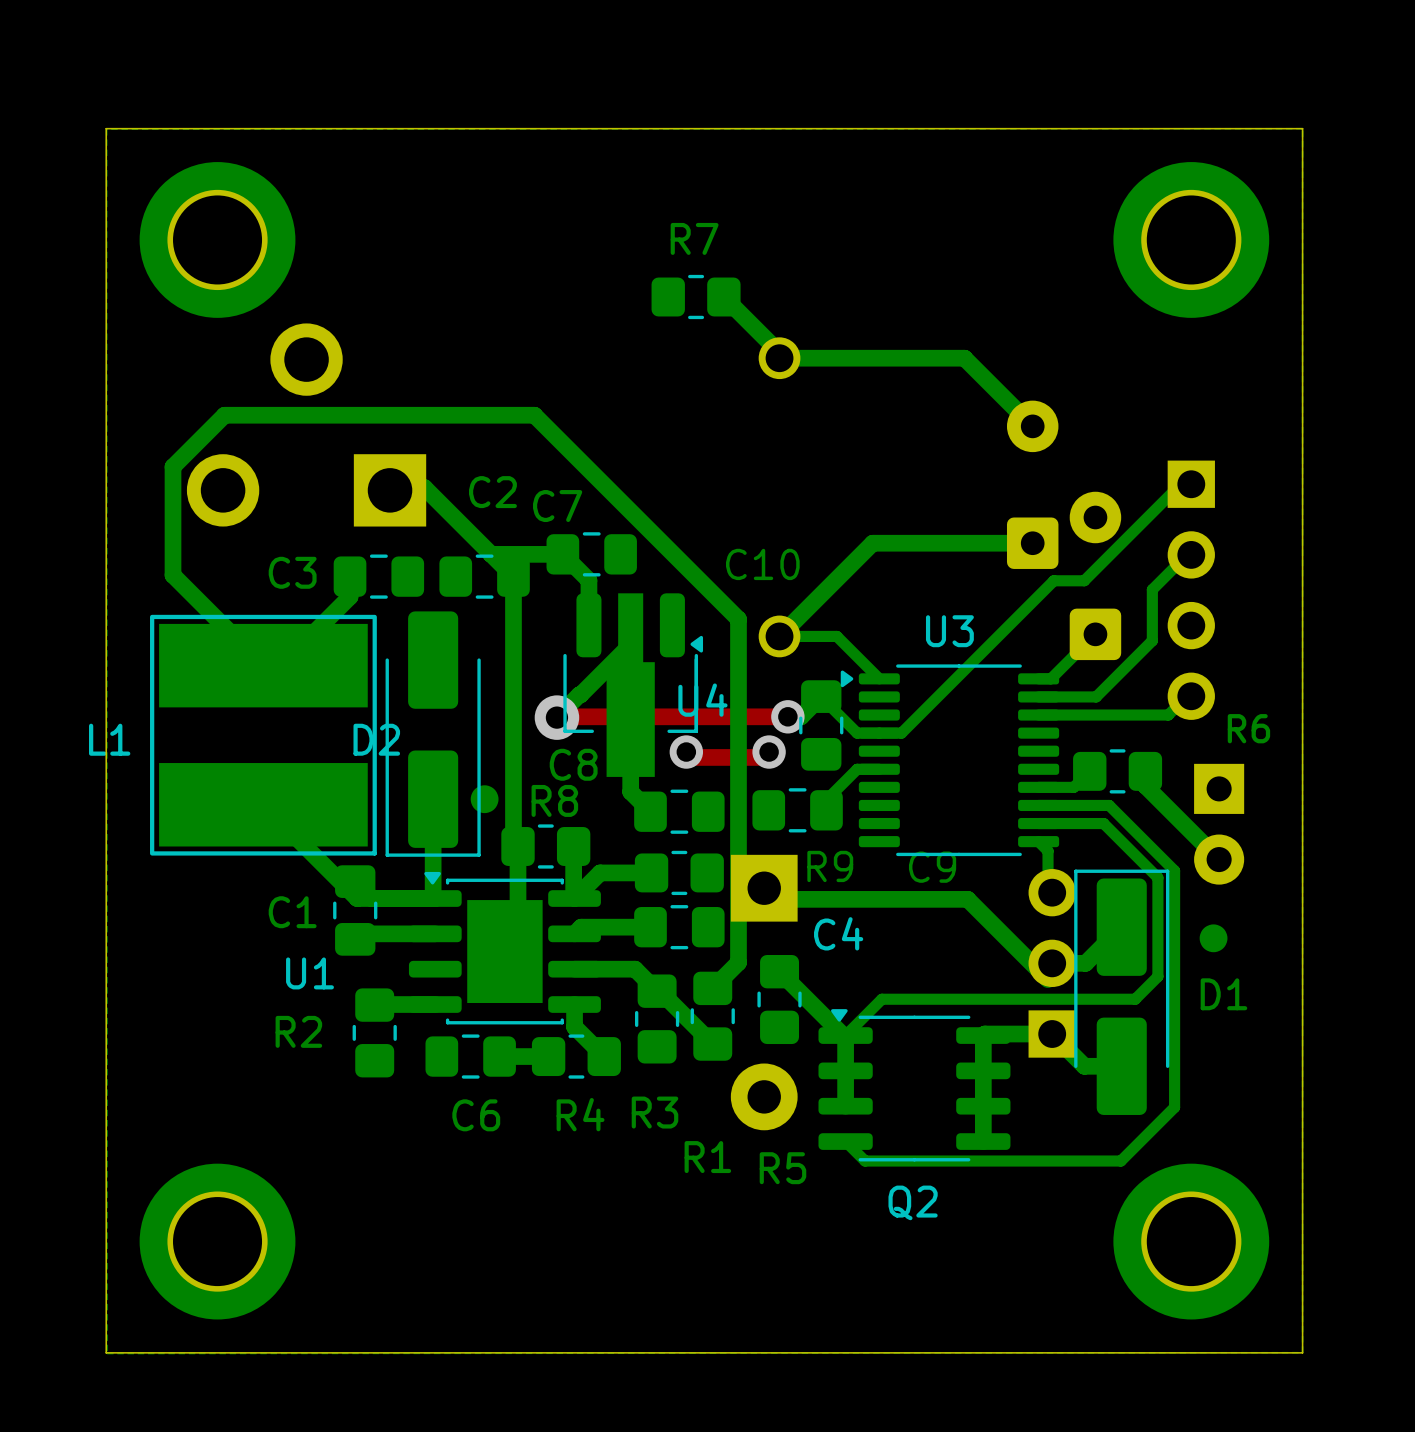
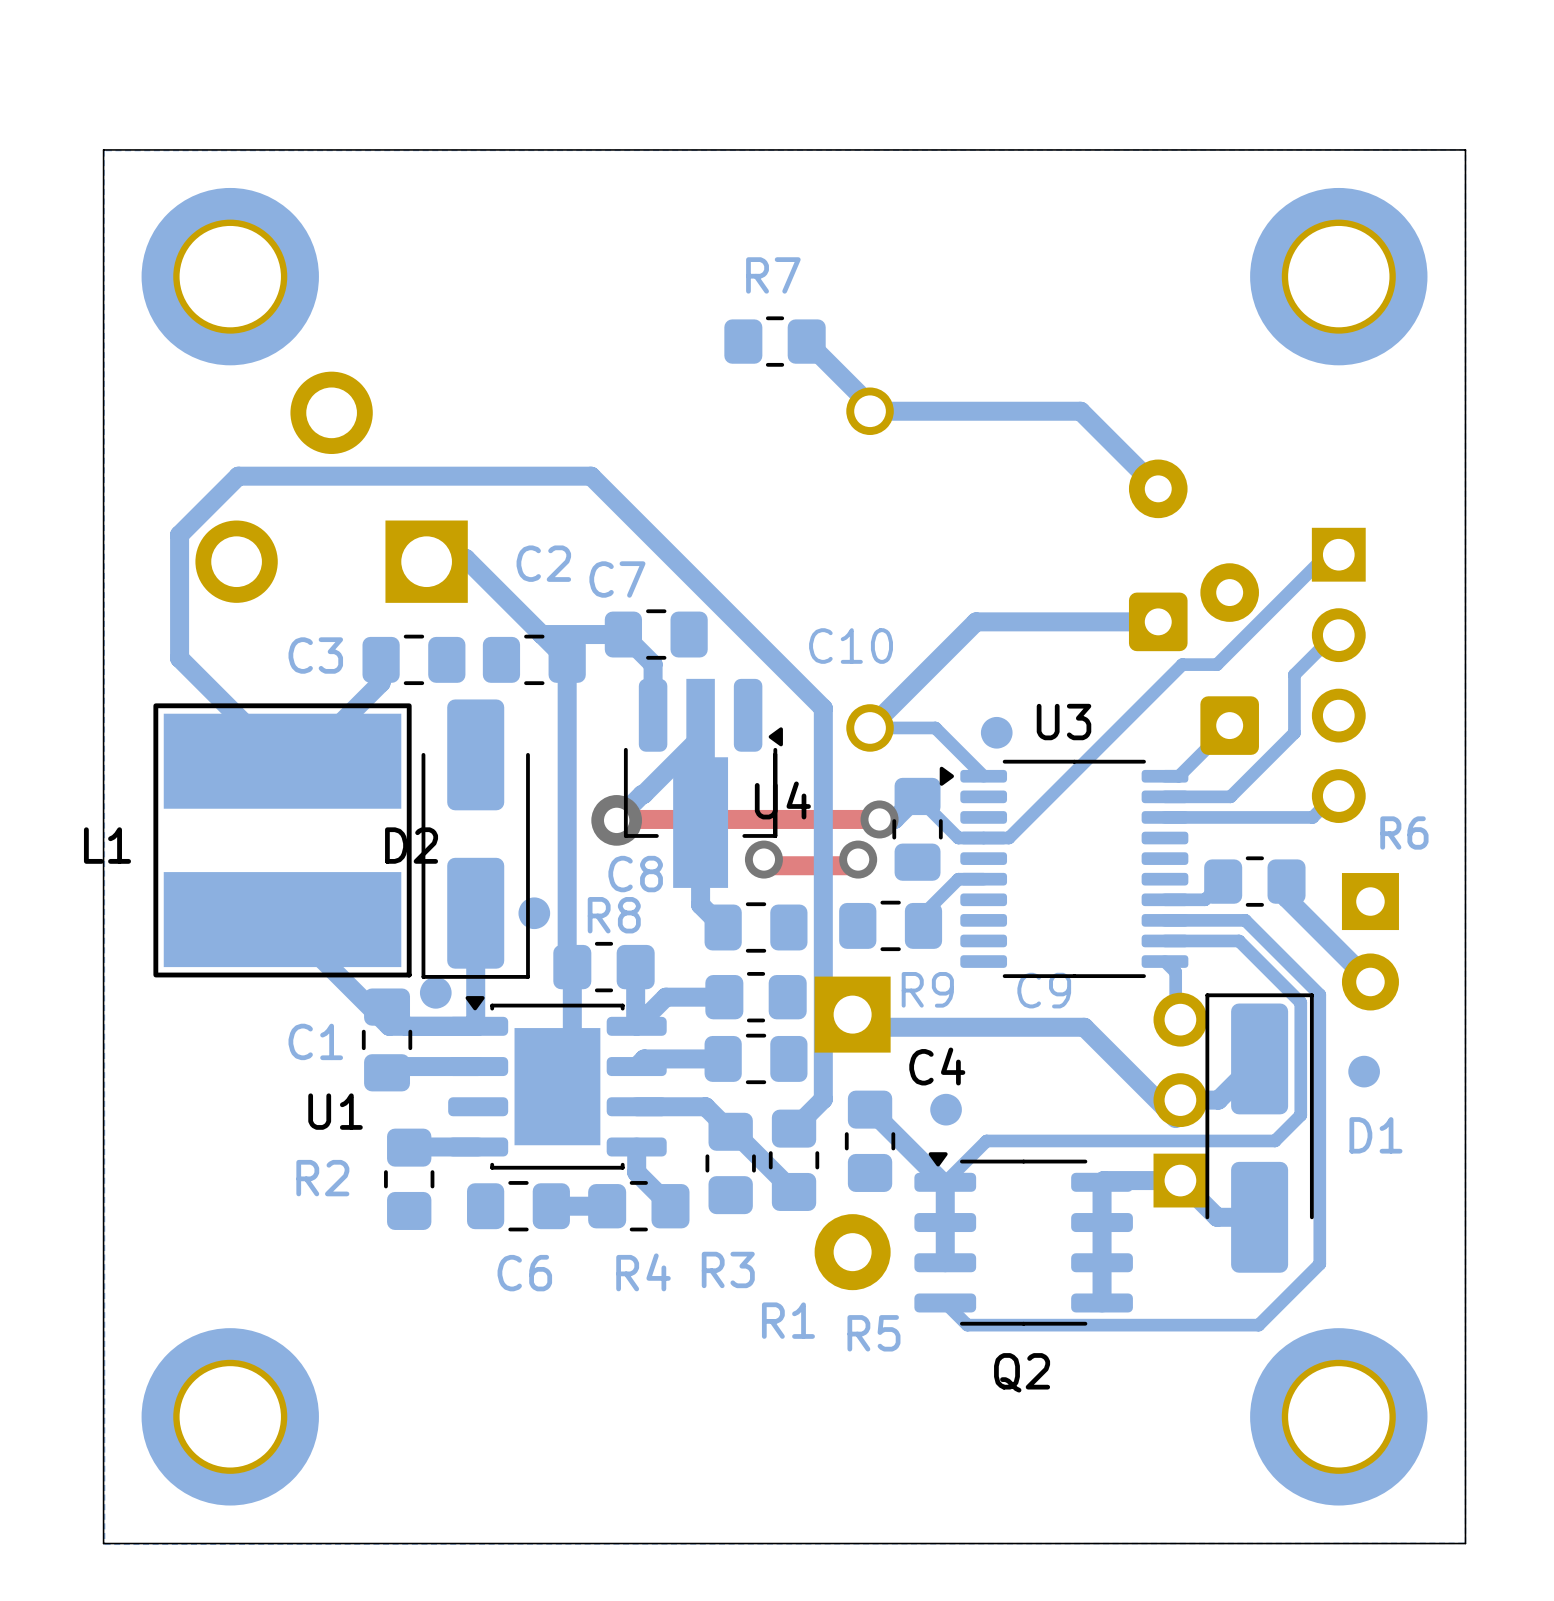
drawing: none -> [980, 716, 1013, 749]
drawing: none -> [419, 976, 452, 1009]
drawing: none -> [930, 1093, 962, 1126]

